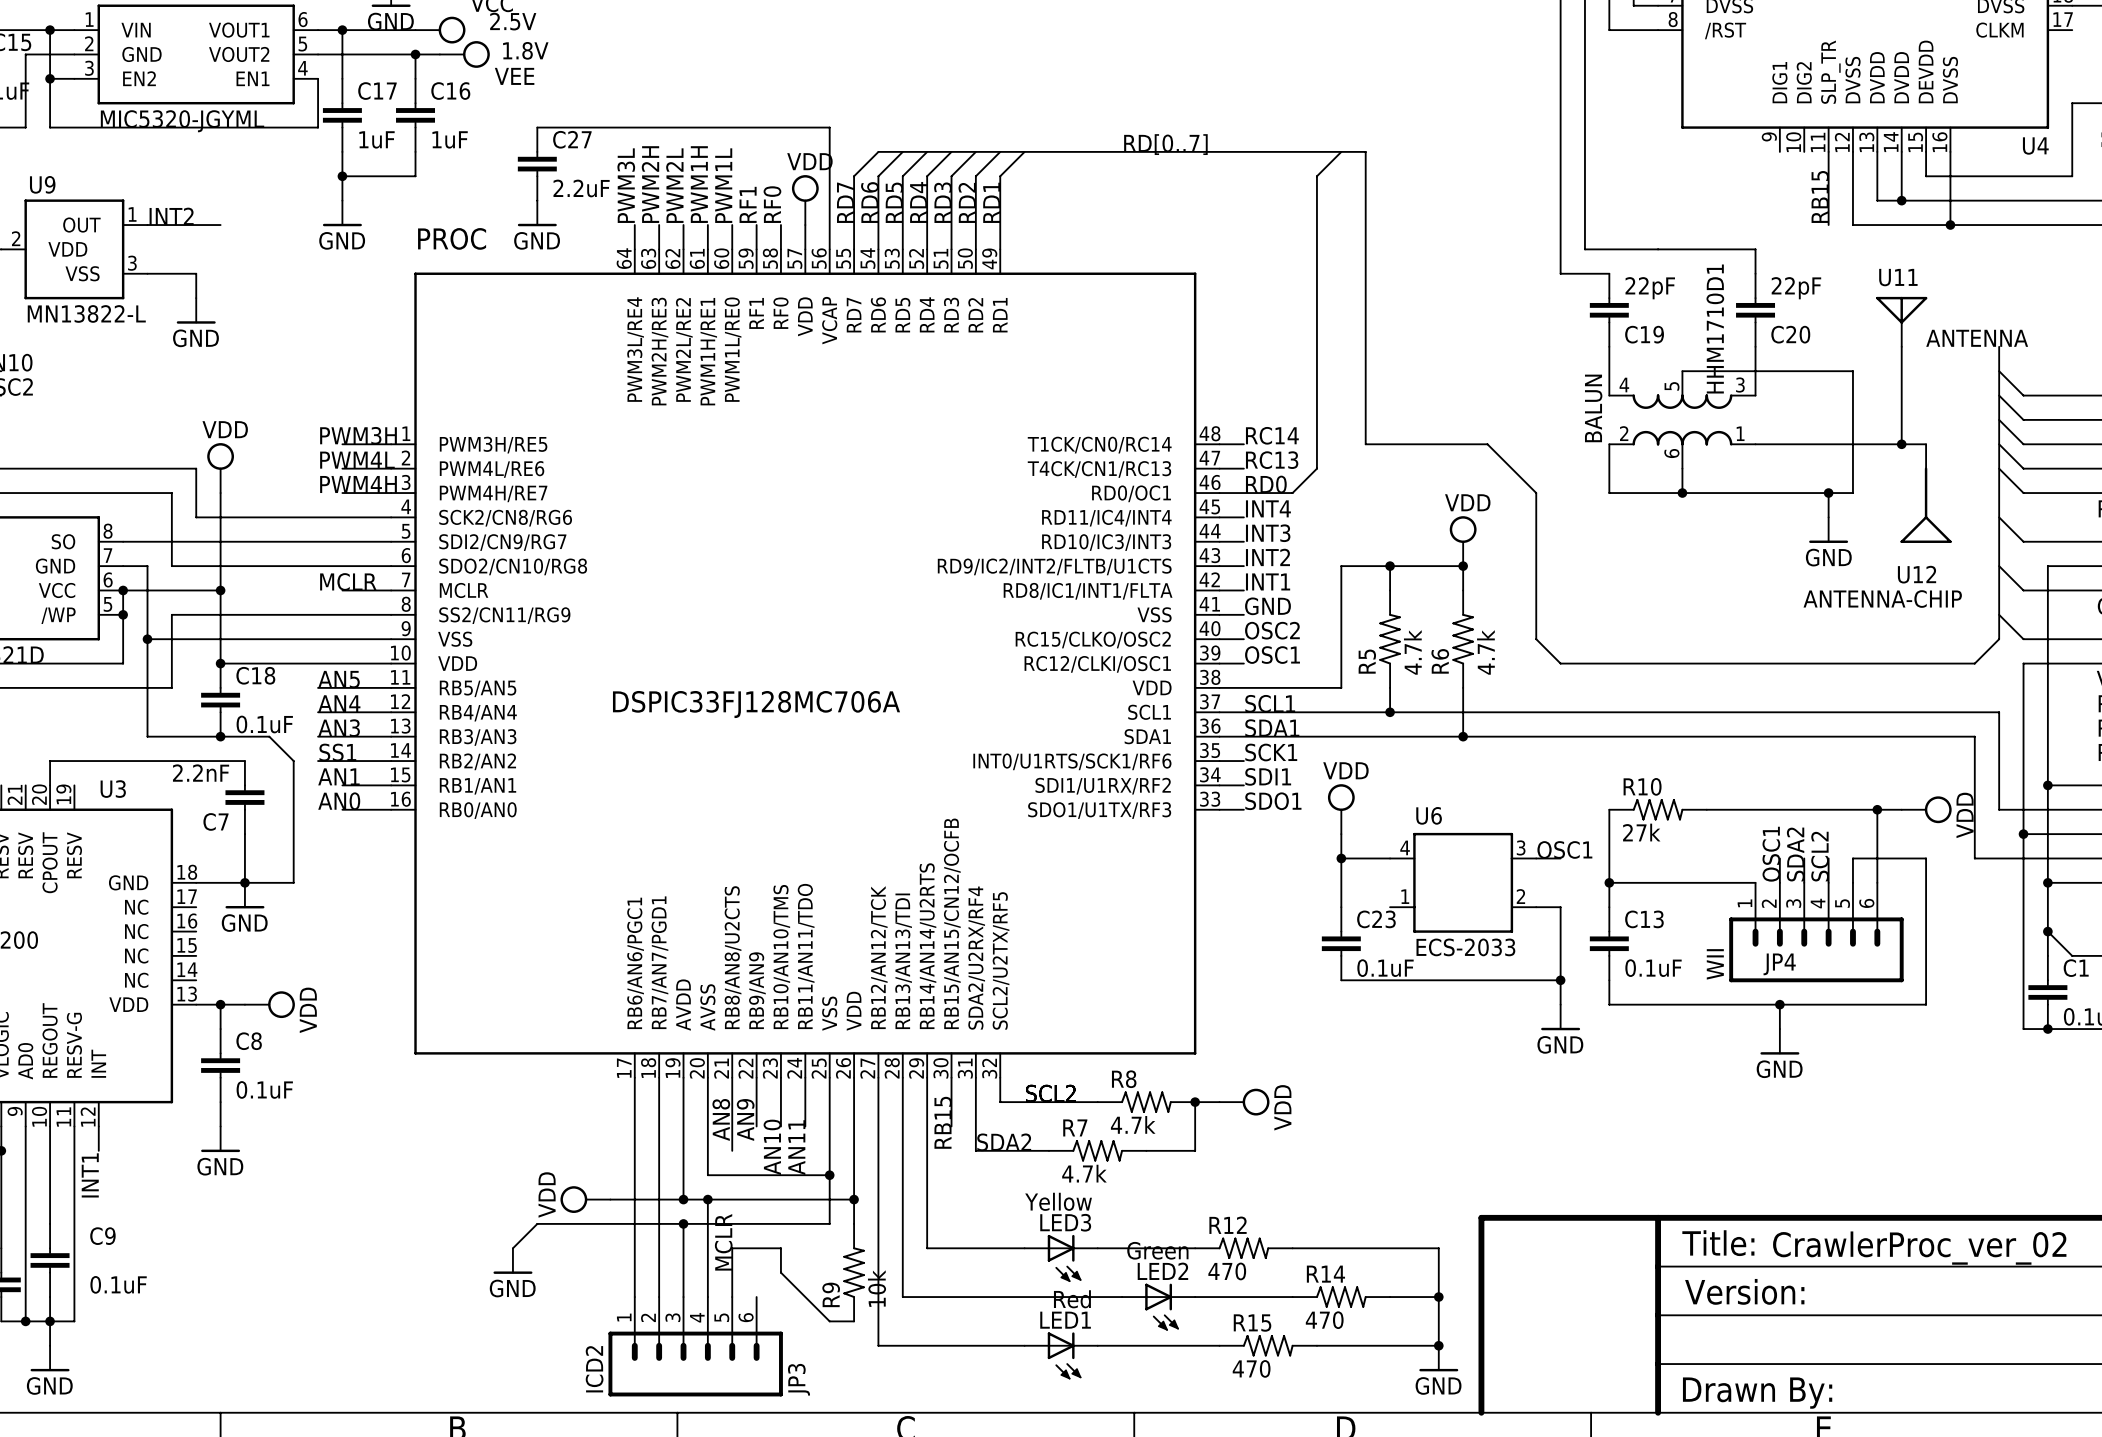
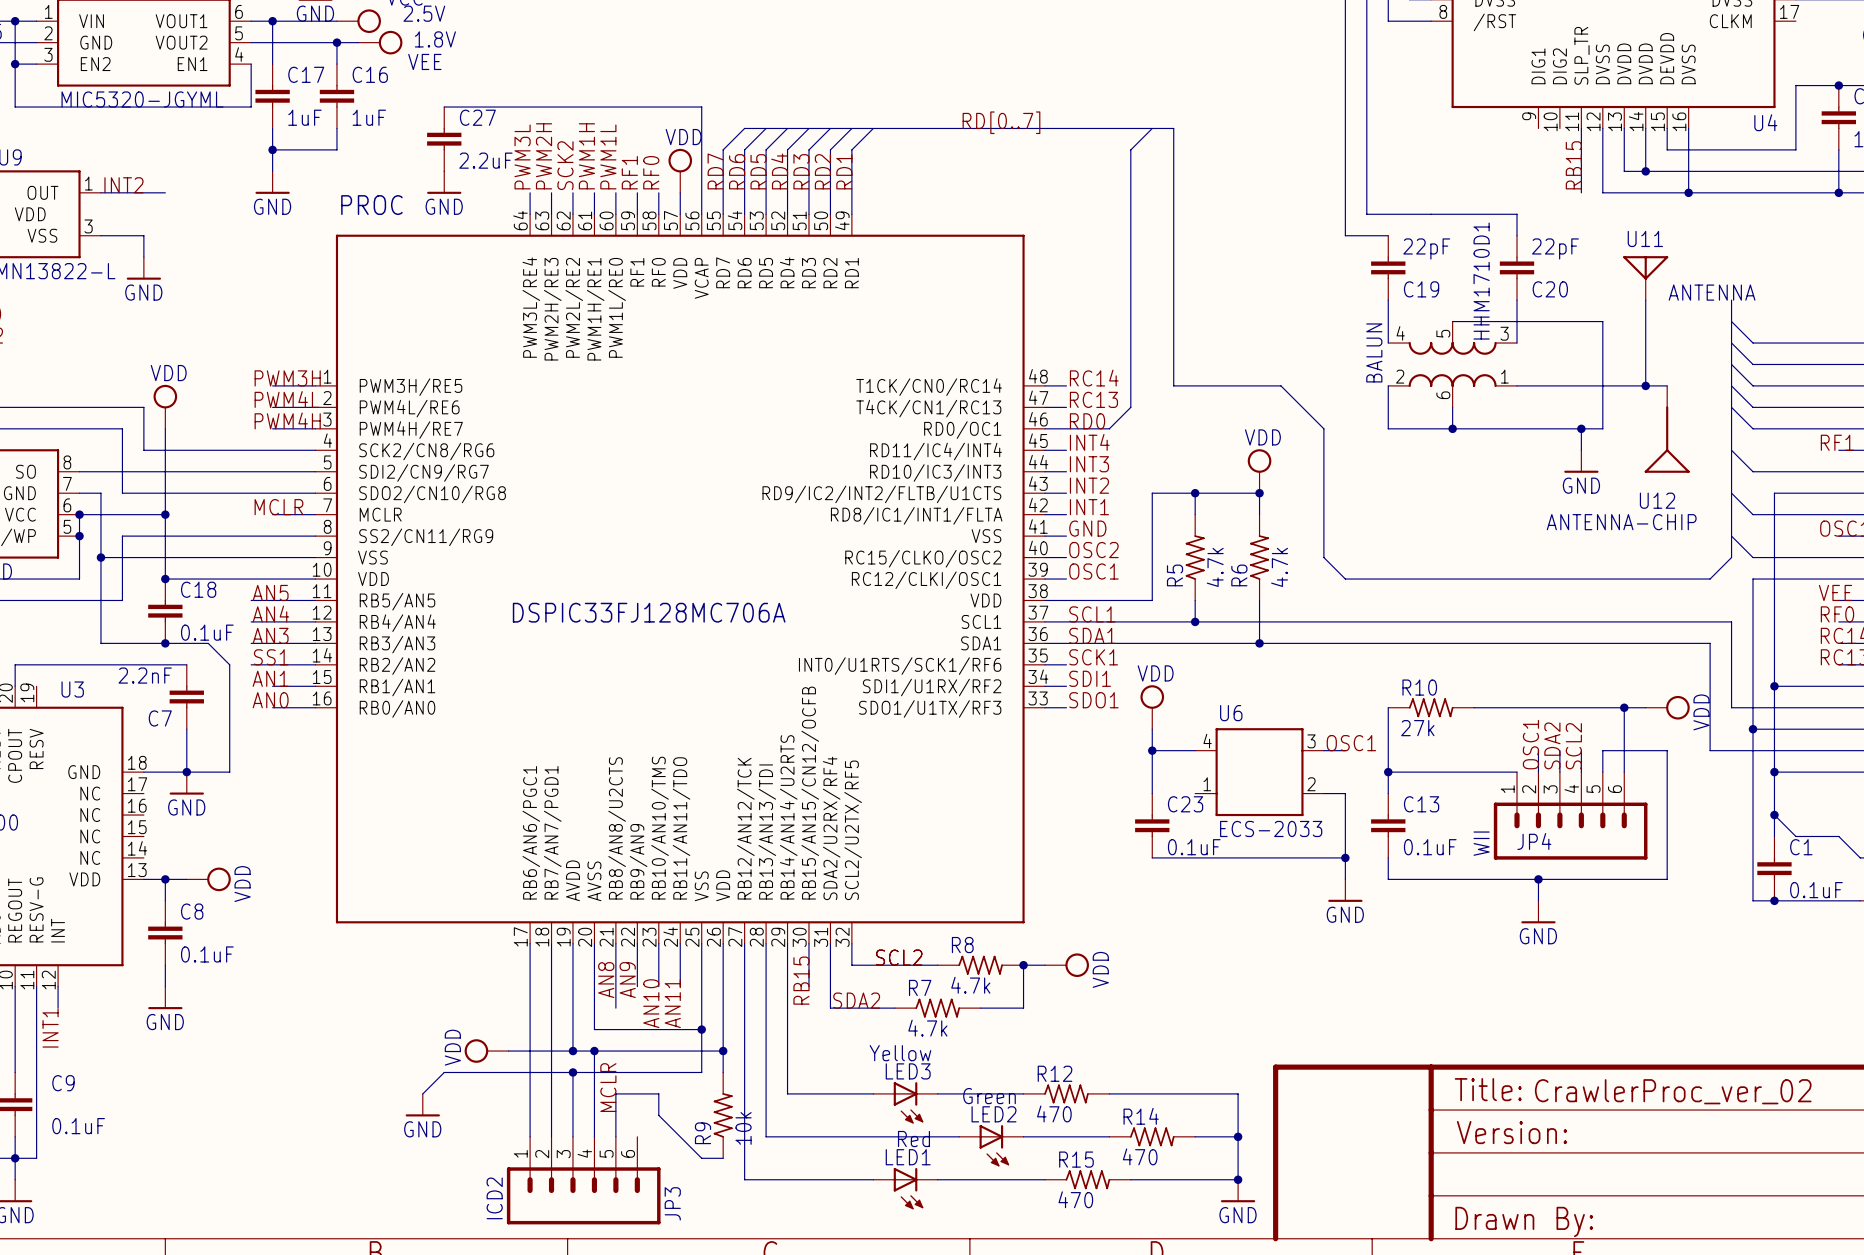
label: PWM2L (674, 185) -> SCK2 (565, 165)

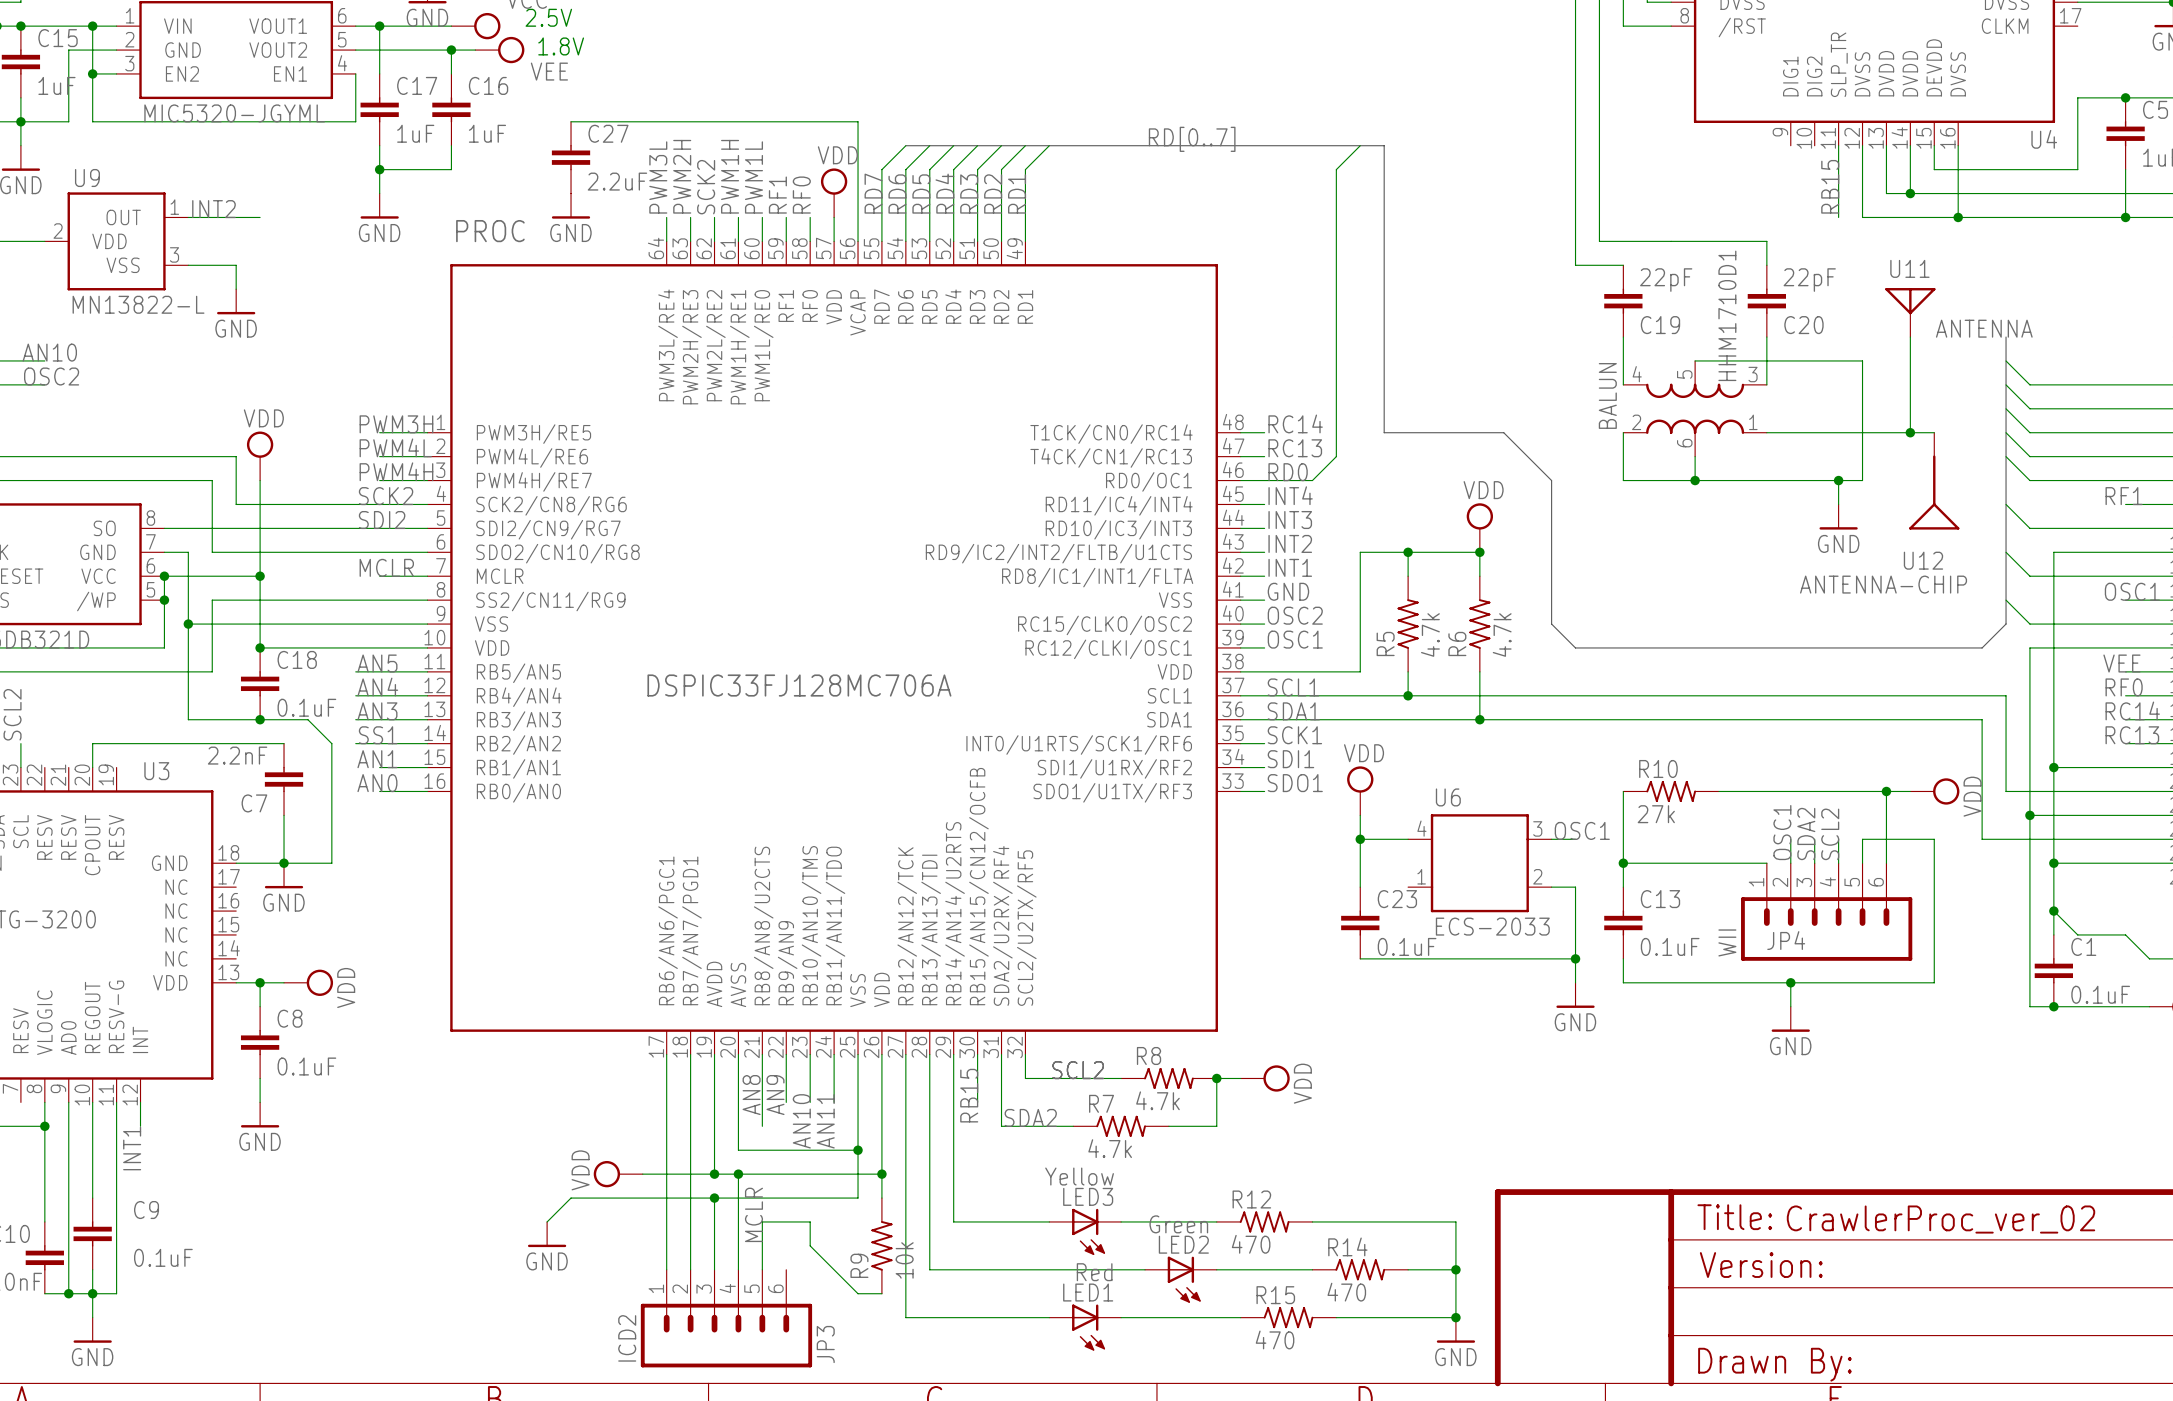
label: none -> SCK2 (386, 496)
label: none -> SDI2 (382, 520)

